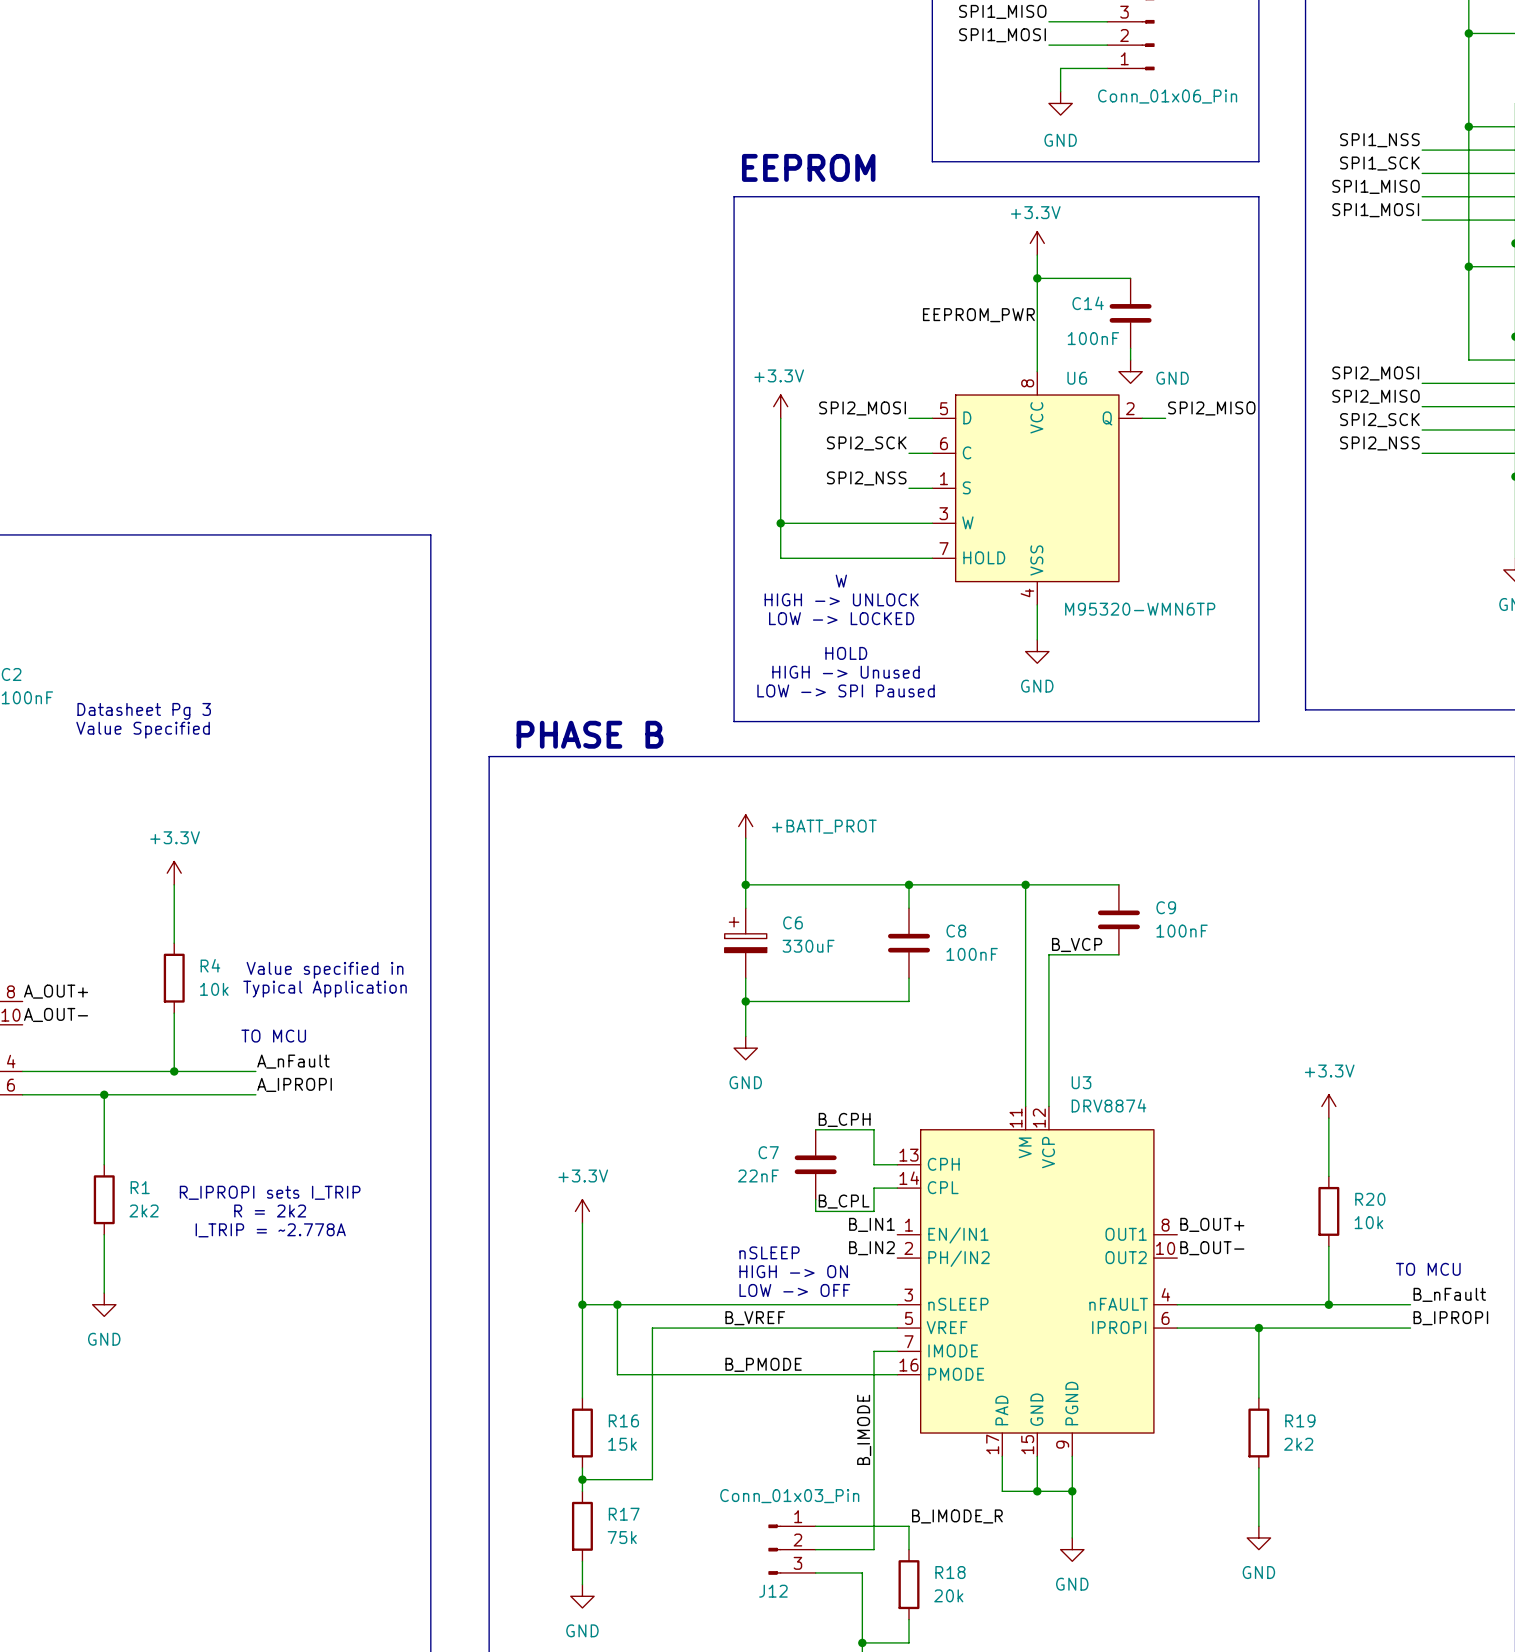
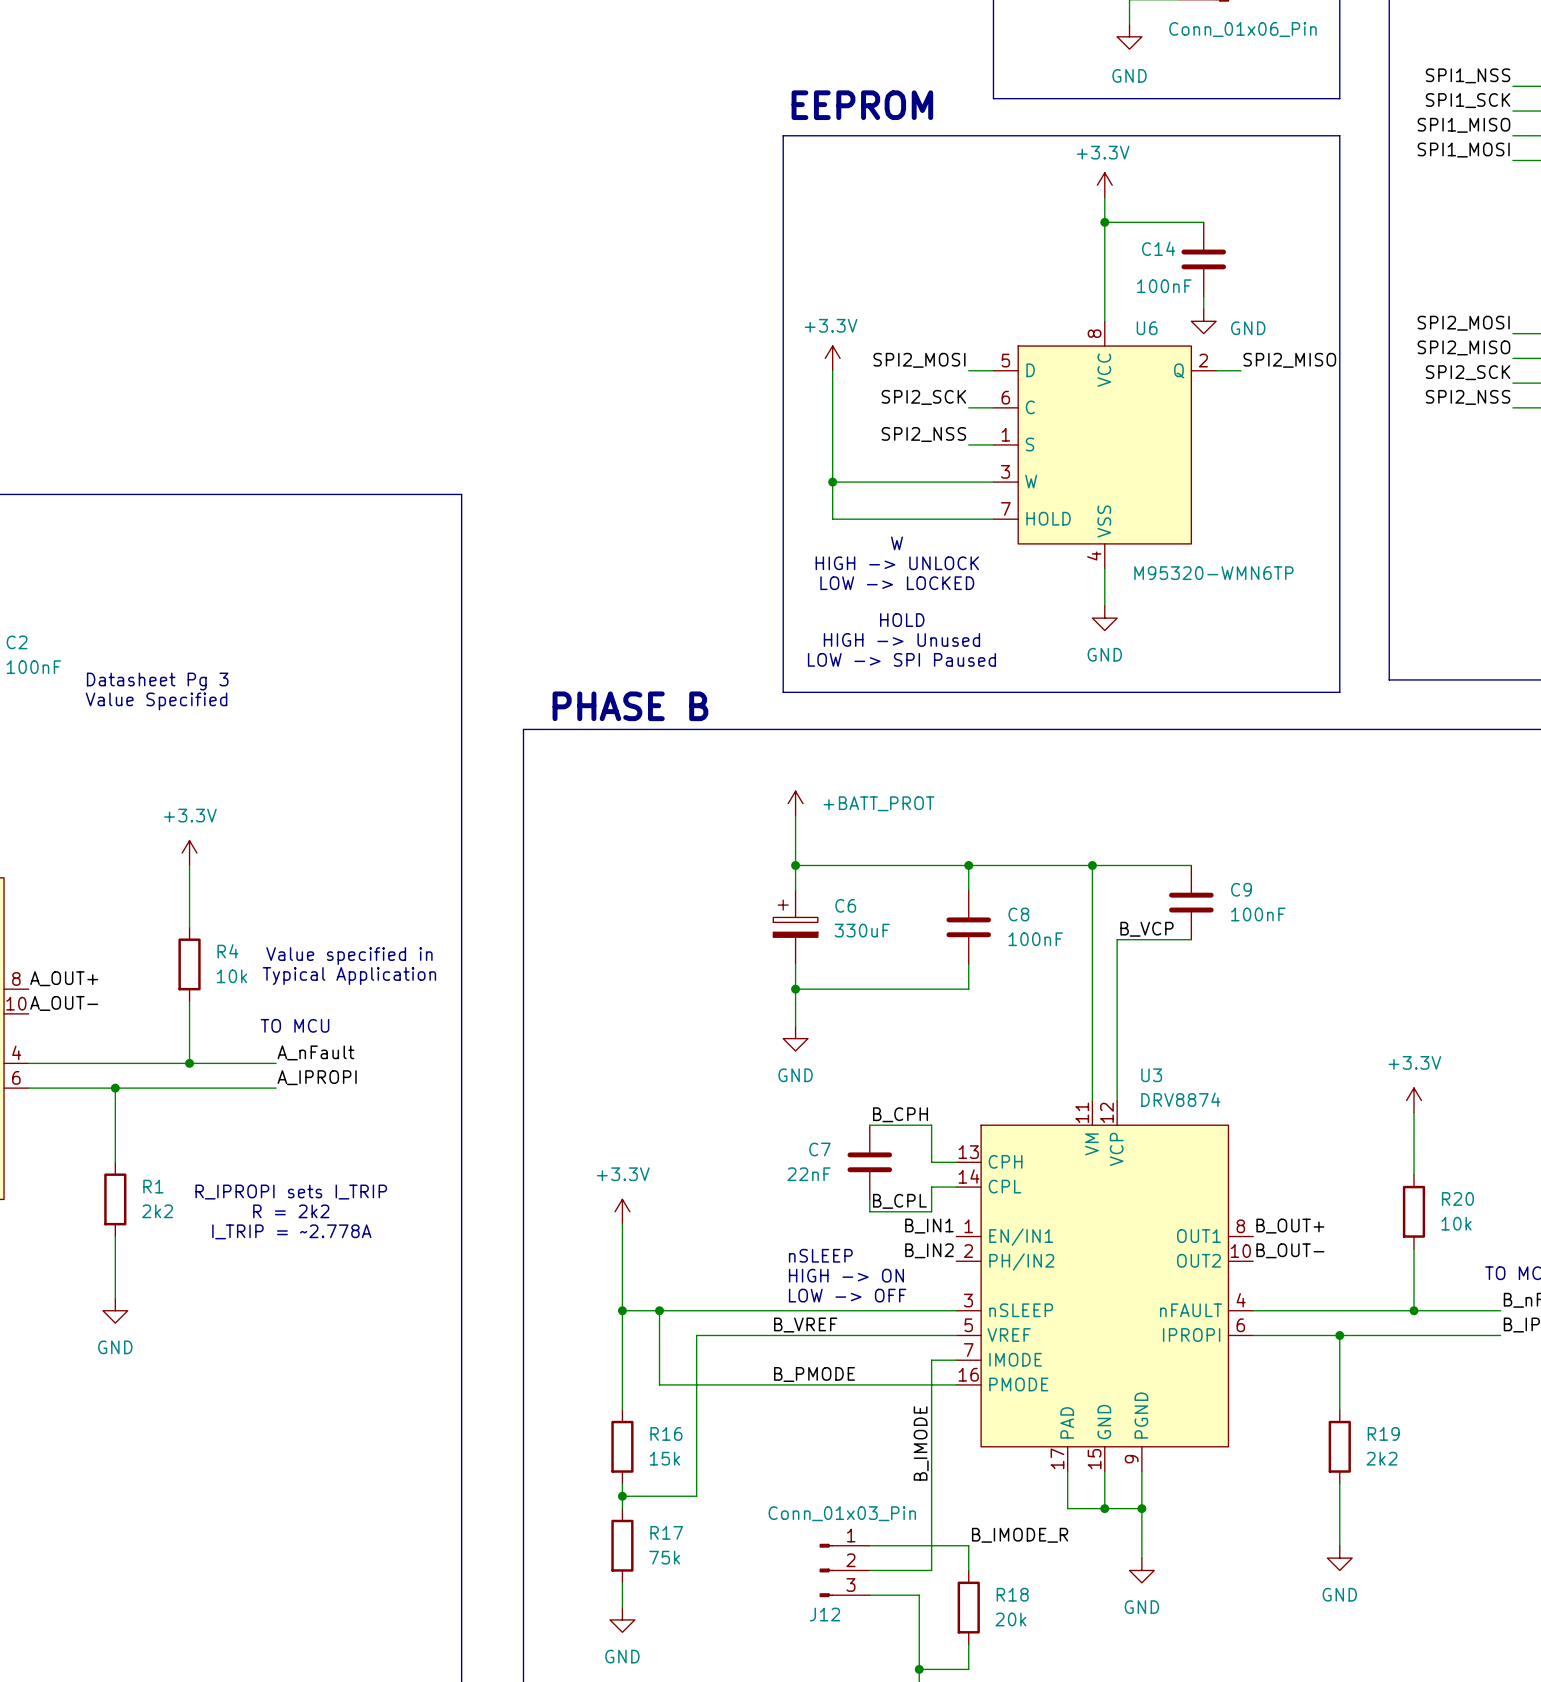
label: EEPROM_PWR (978, 315) -> none

